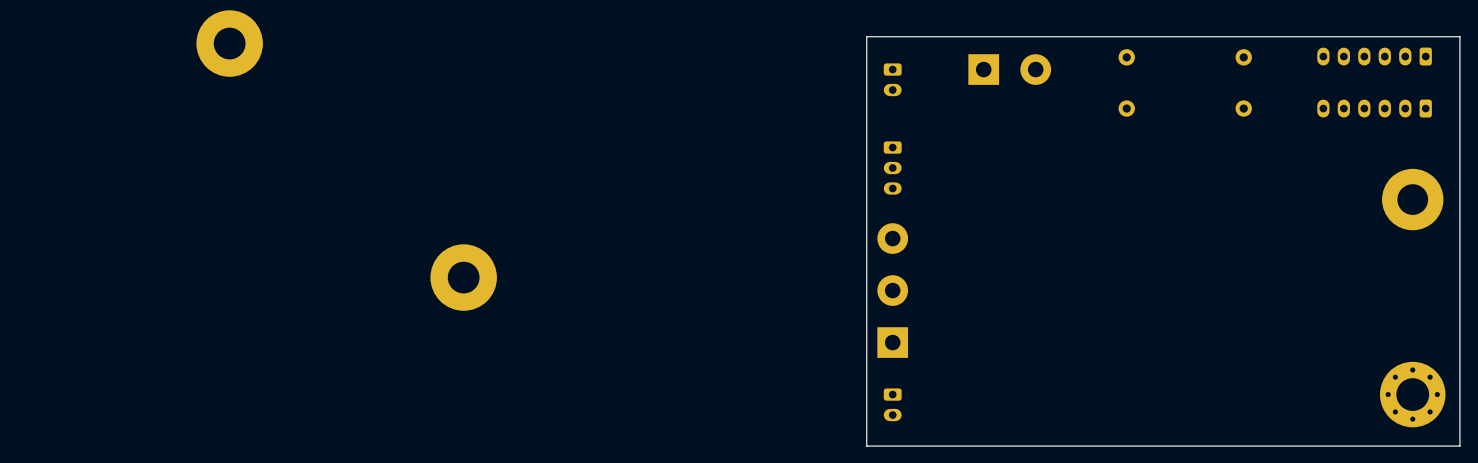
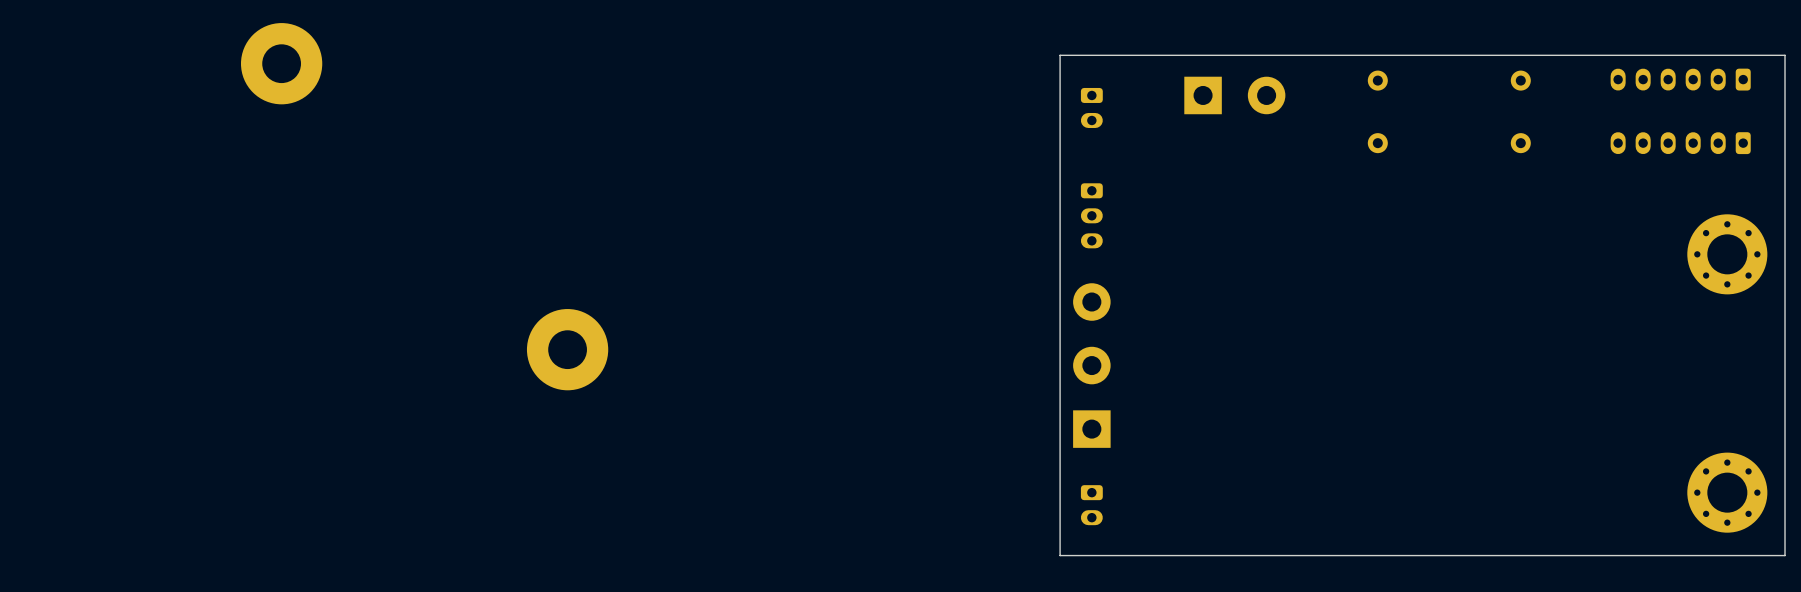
part footprint: [1382, 168, 1444, 231] -> [1687, 214, 1768, 295]

